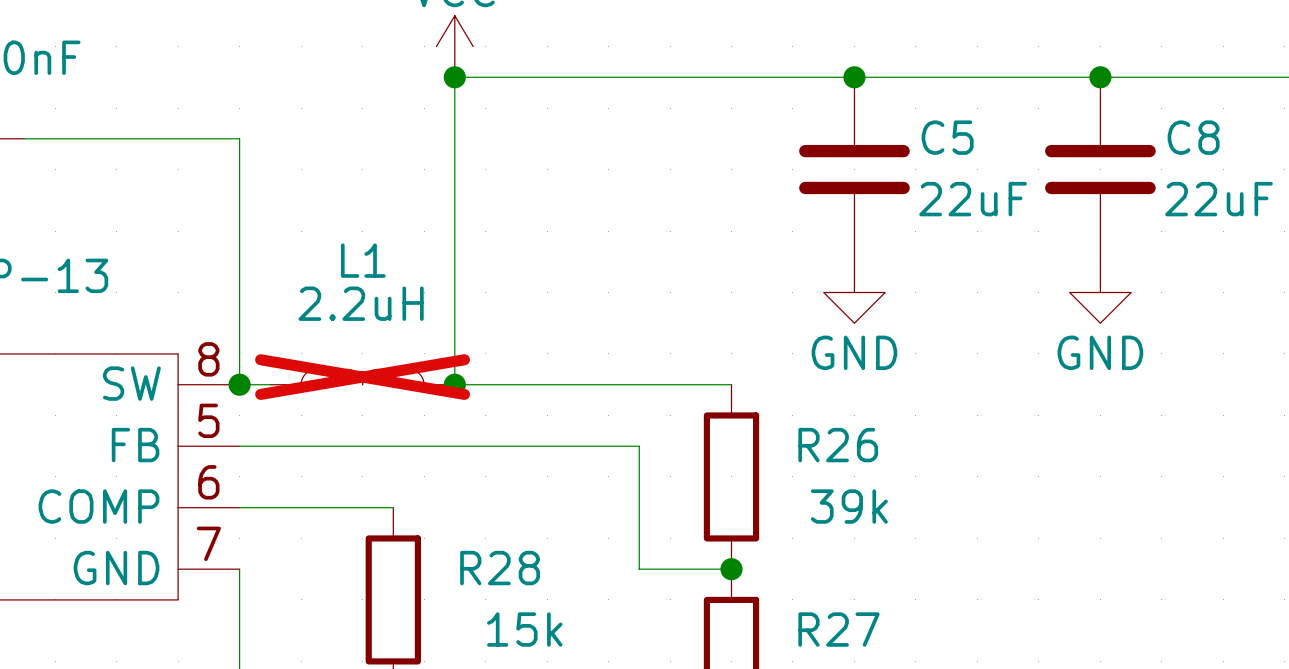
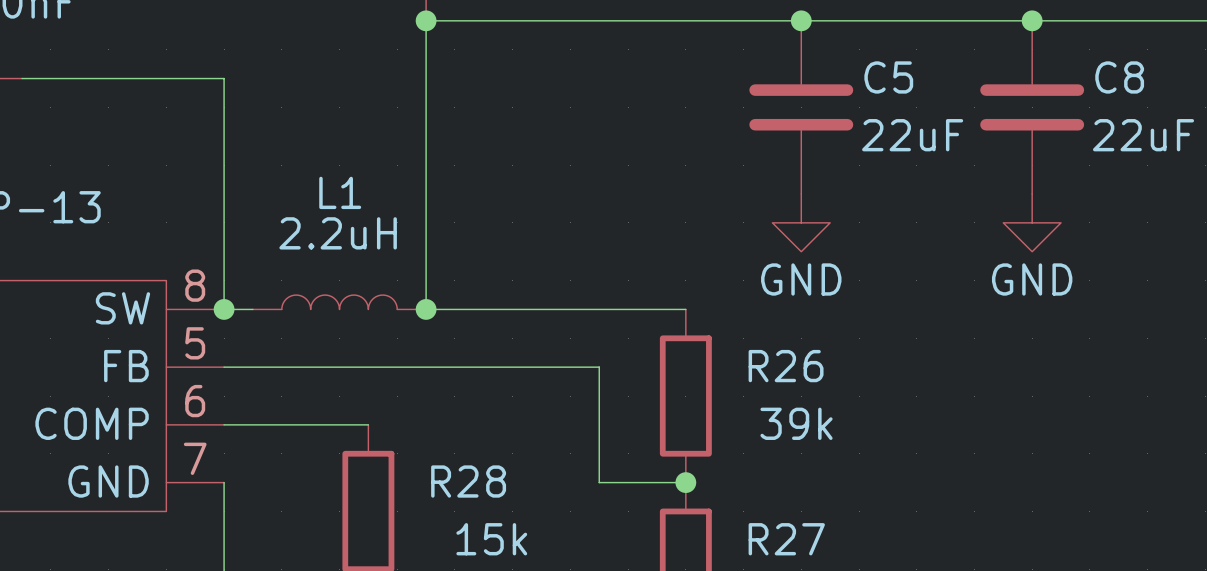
L1 do-not-place cross: (362, 377) -> none

